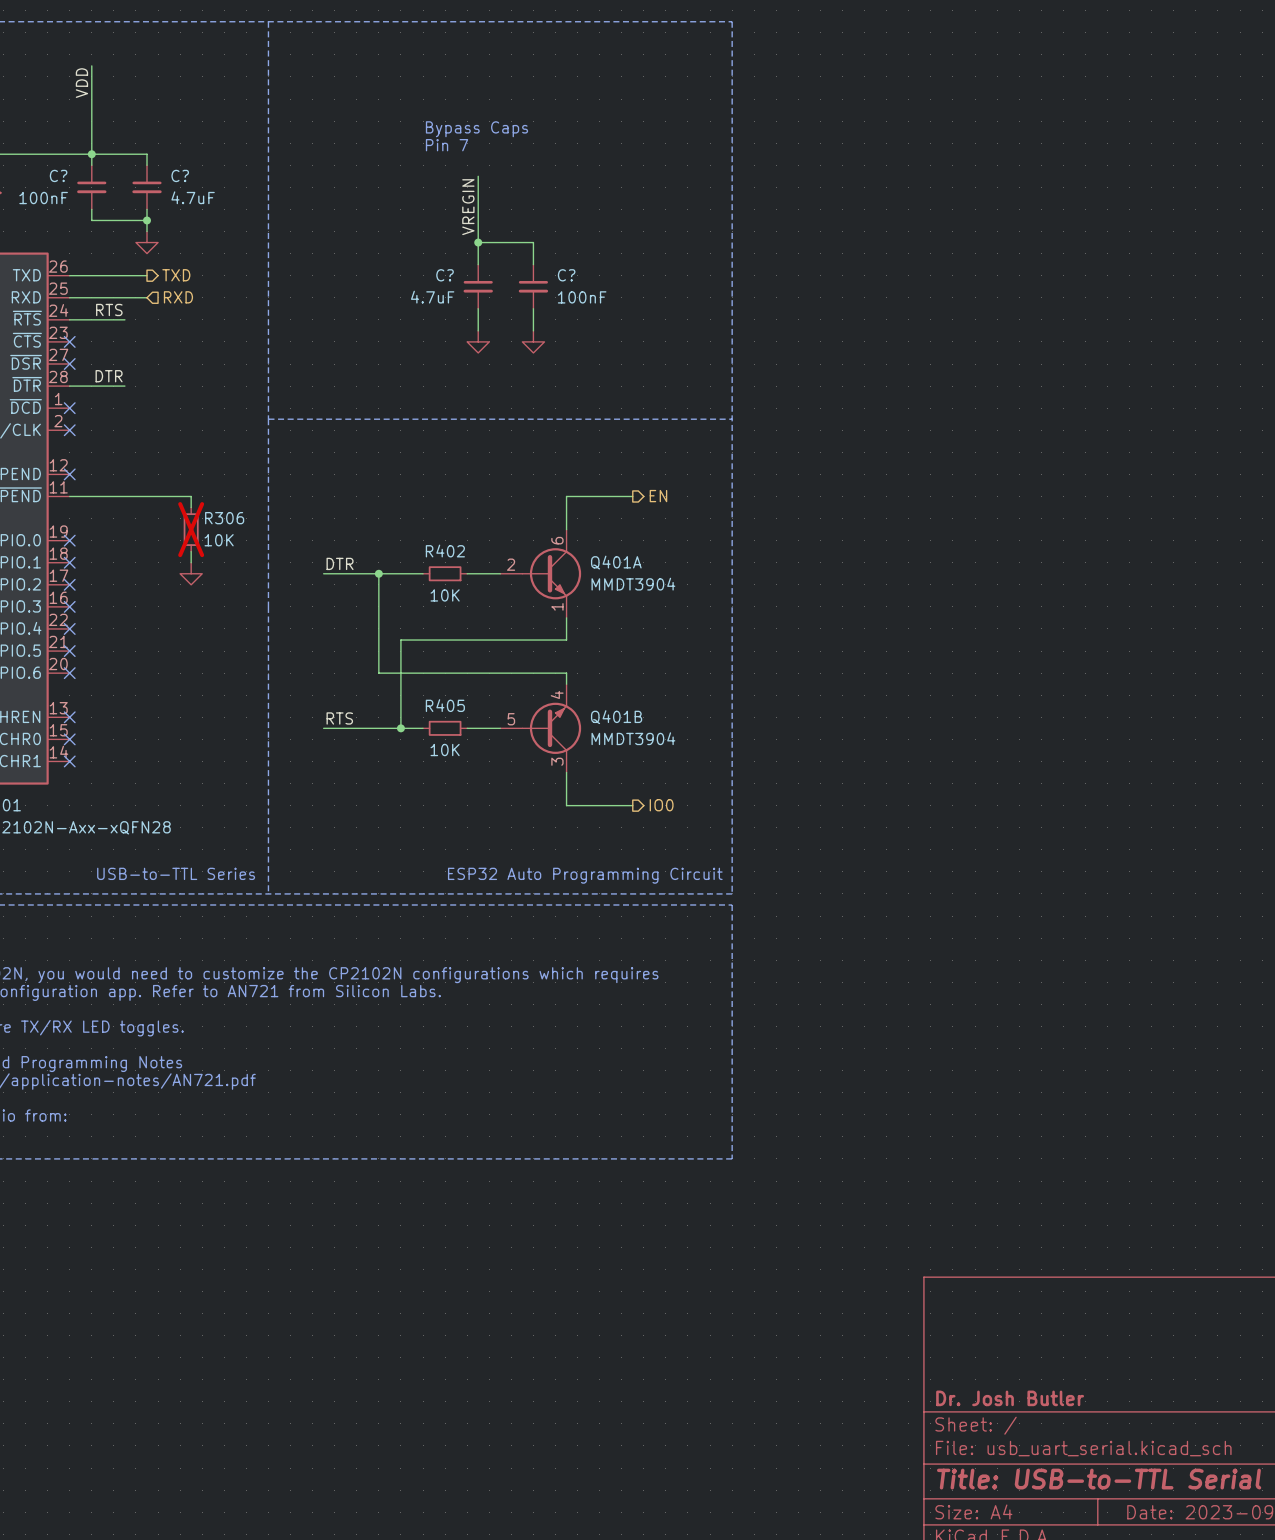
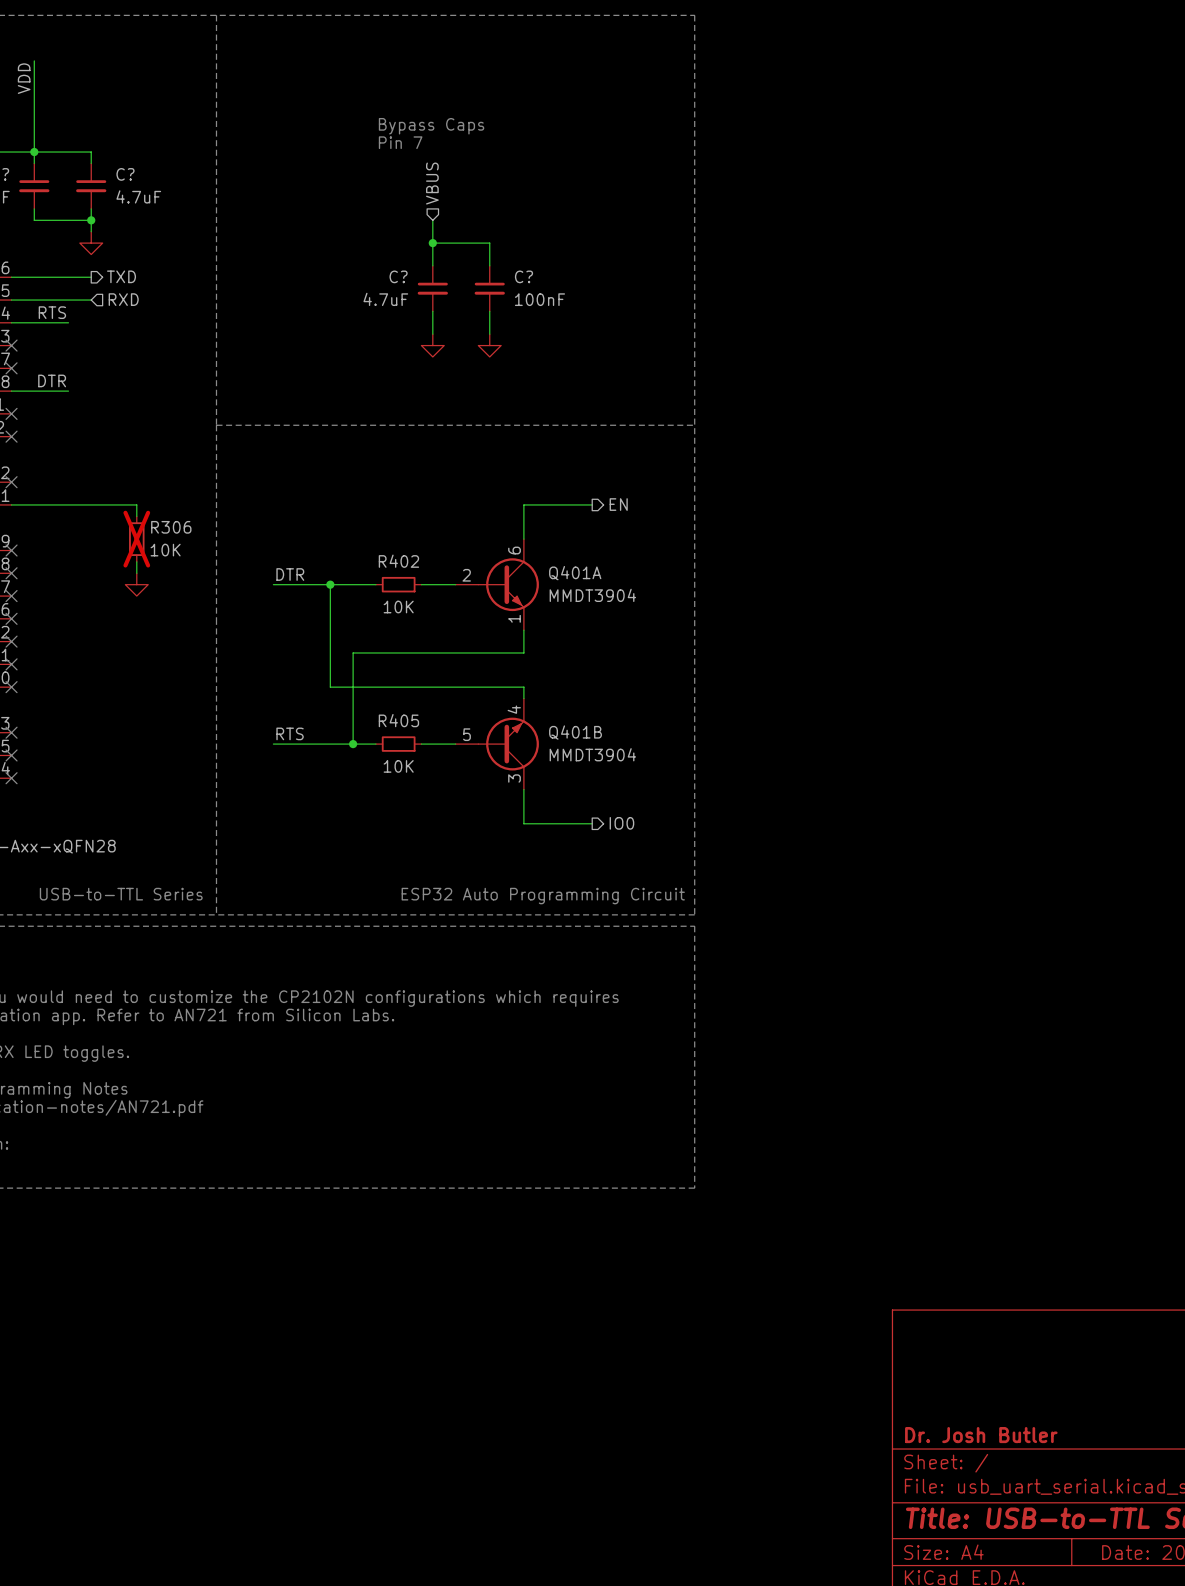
wire: (478, 176) (478, 220) -> none
hierarchical label: none -> VBUS (432, 183)
label: VREGIN (468, 207) -> none

